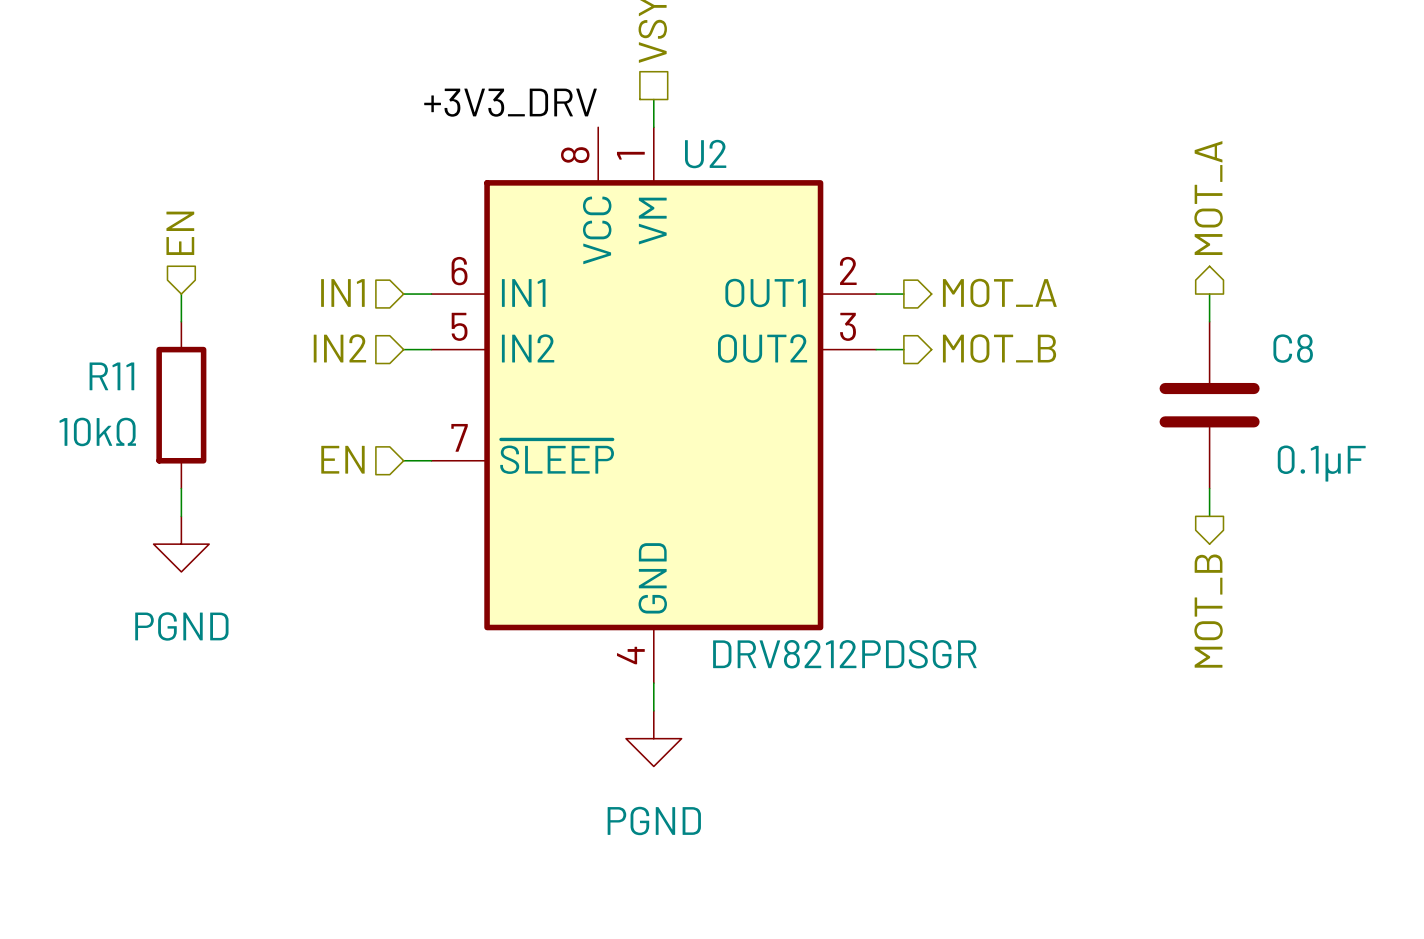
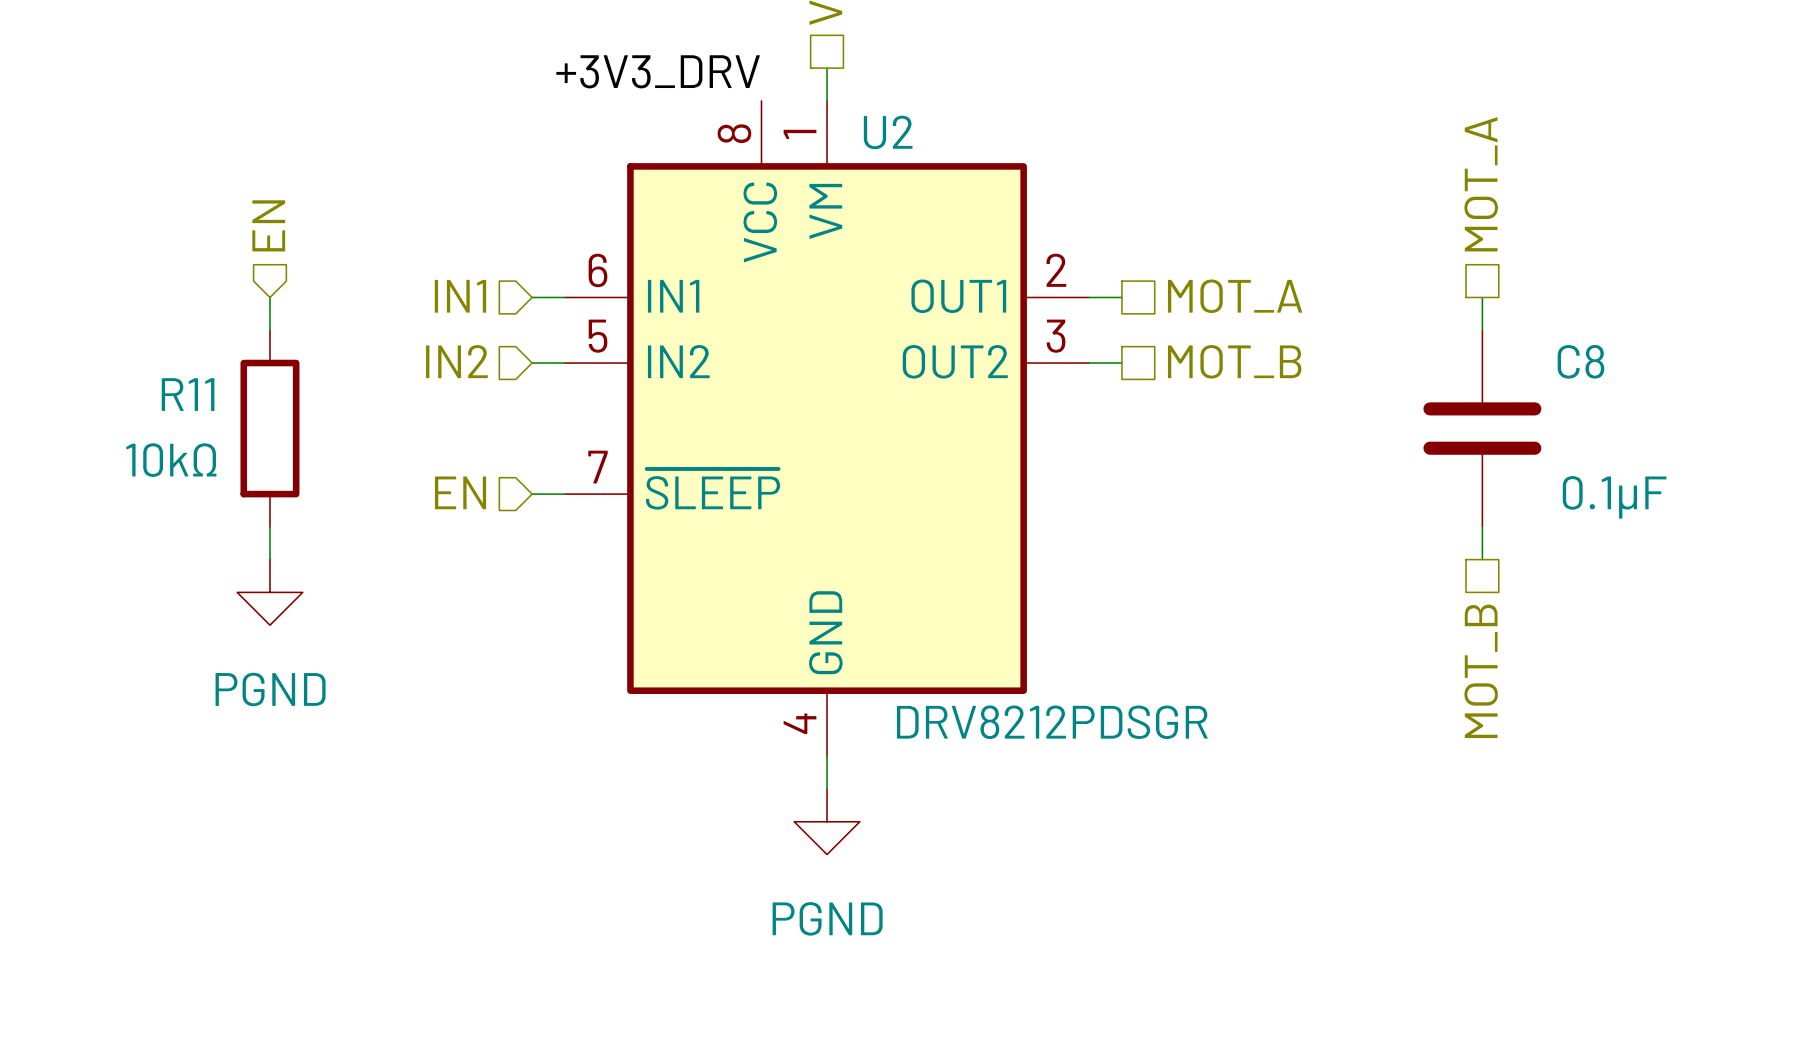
hierarchical label shape: output (1208, 198) -> passive (1481, 184)
hierarchical label shape: output (999, 292) -> passive (1235, 296)
hierarchical label shape: output (999, 348) -> passive (1234, 361)
hierarchical label shape: output (1208, 611) -> passive (1481, 671)

